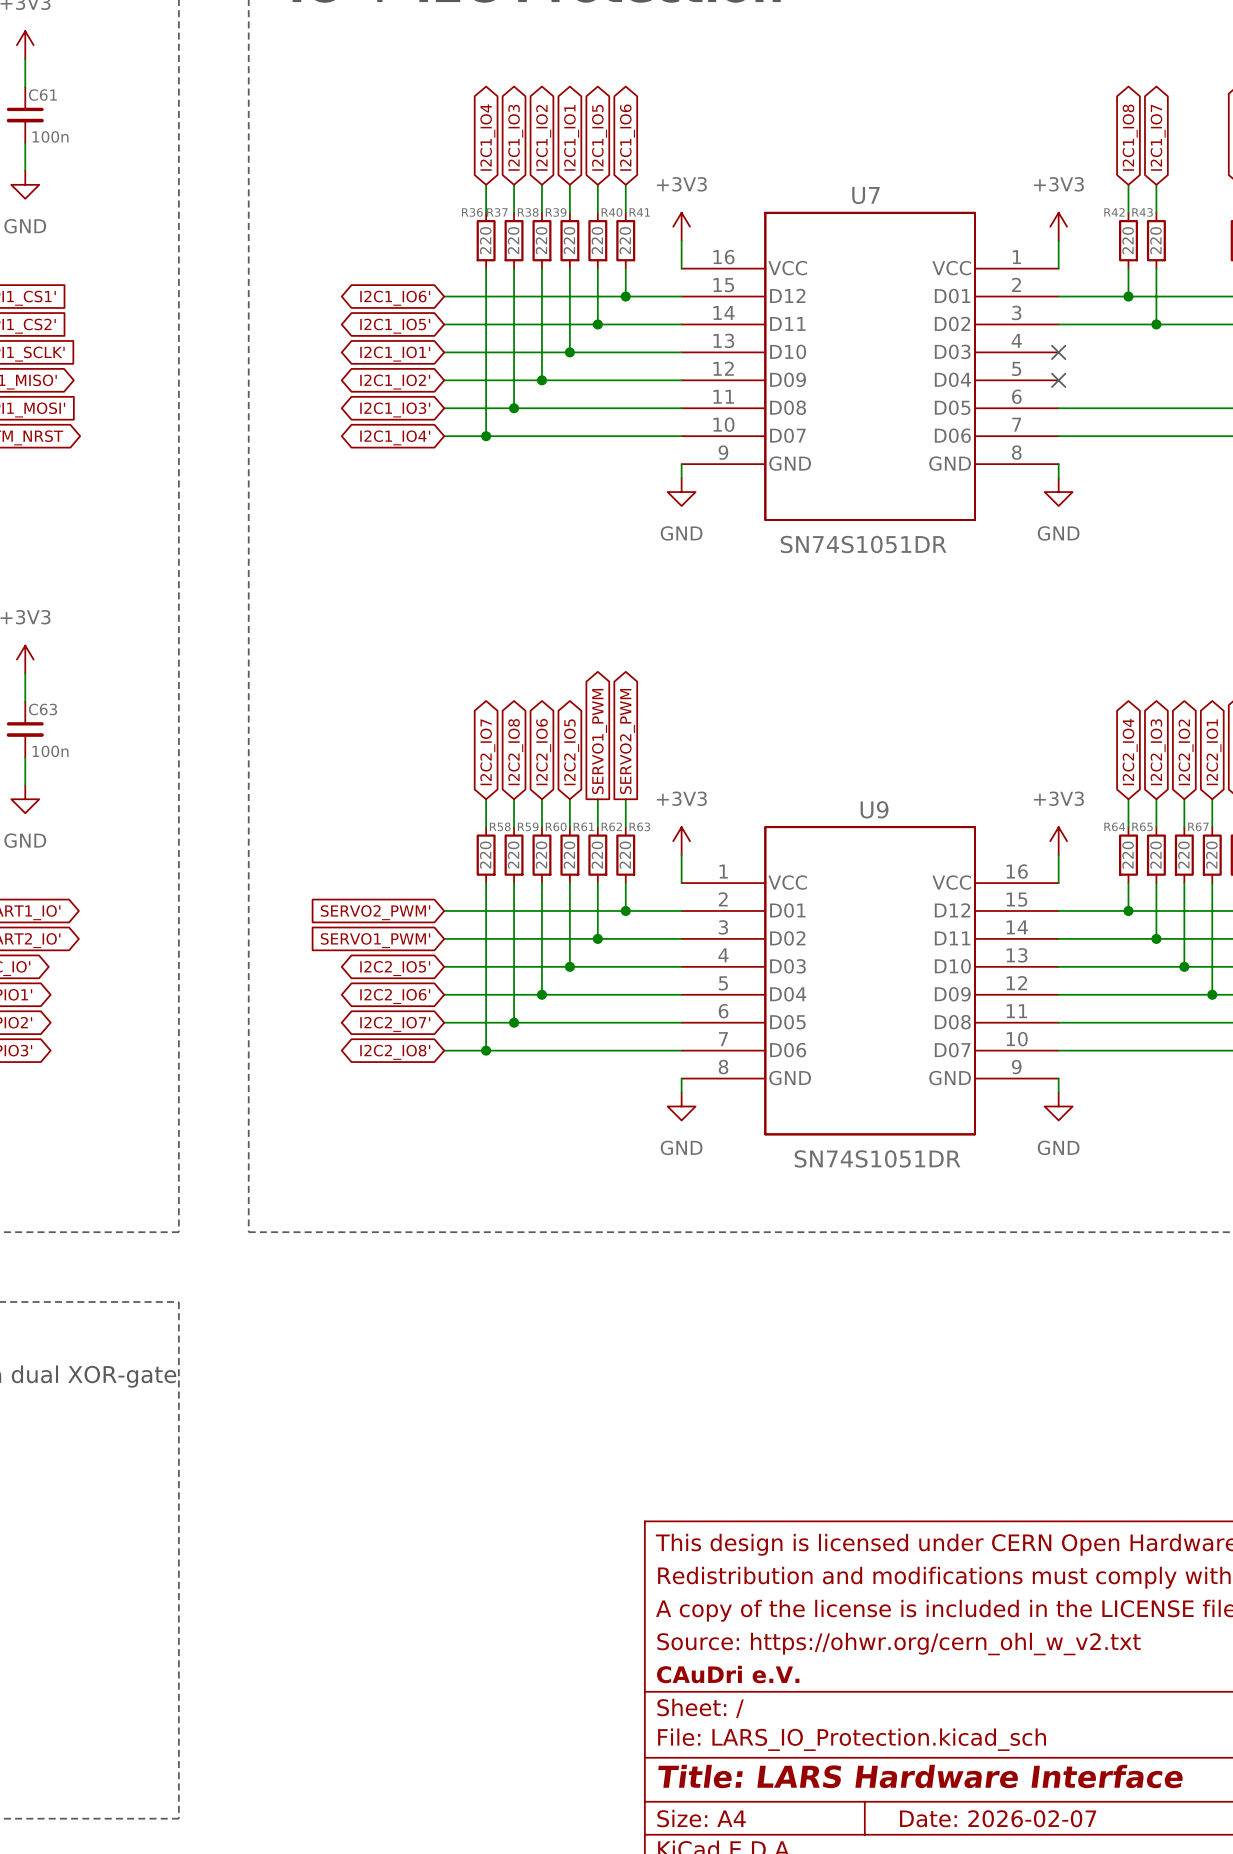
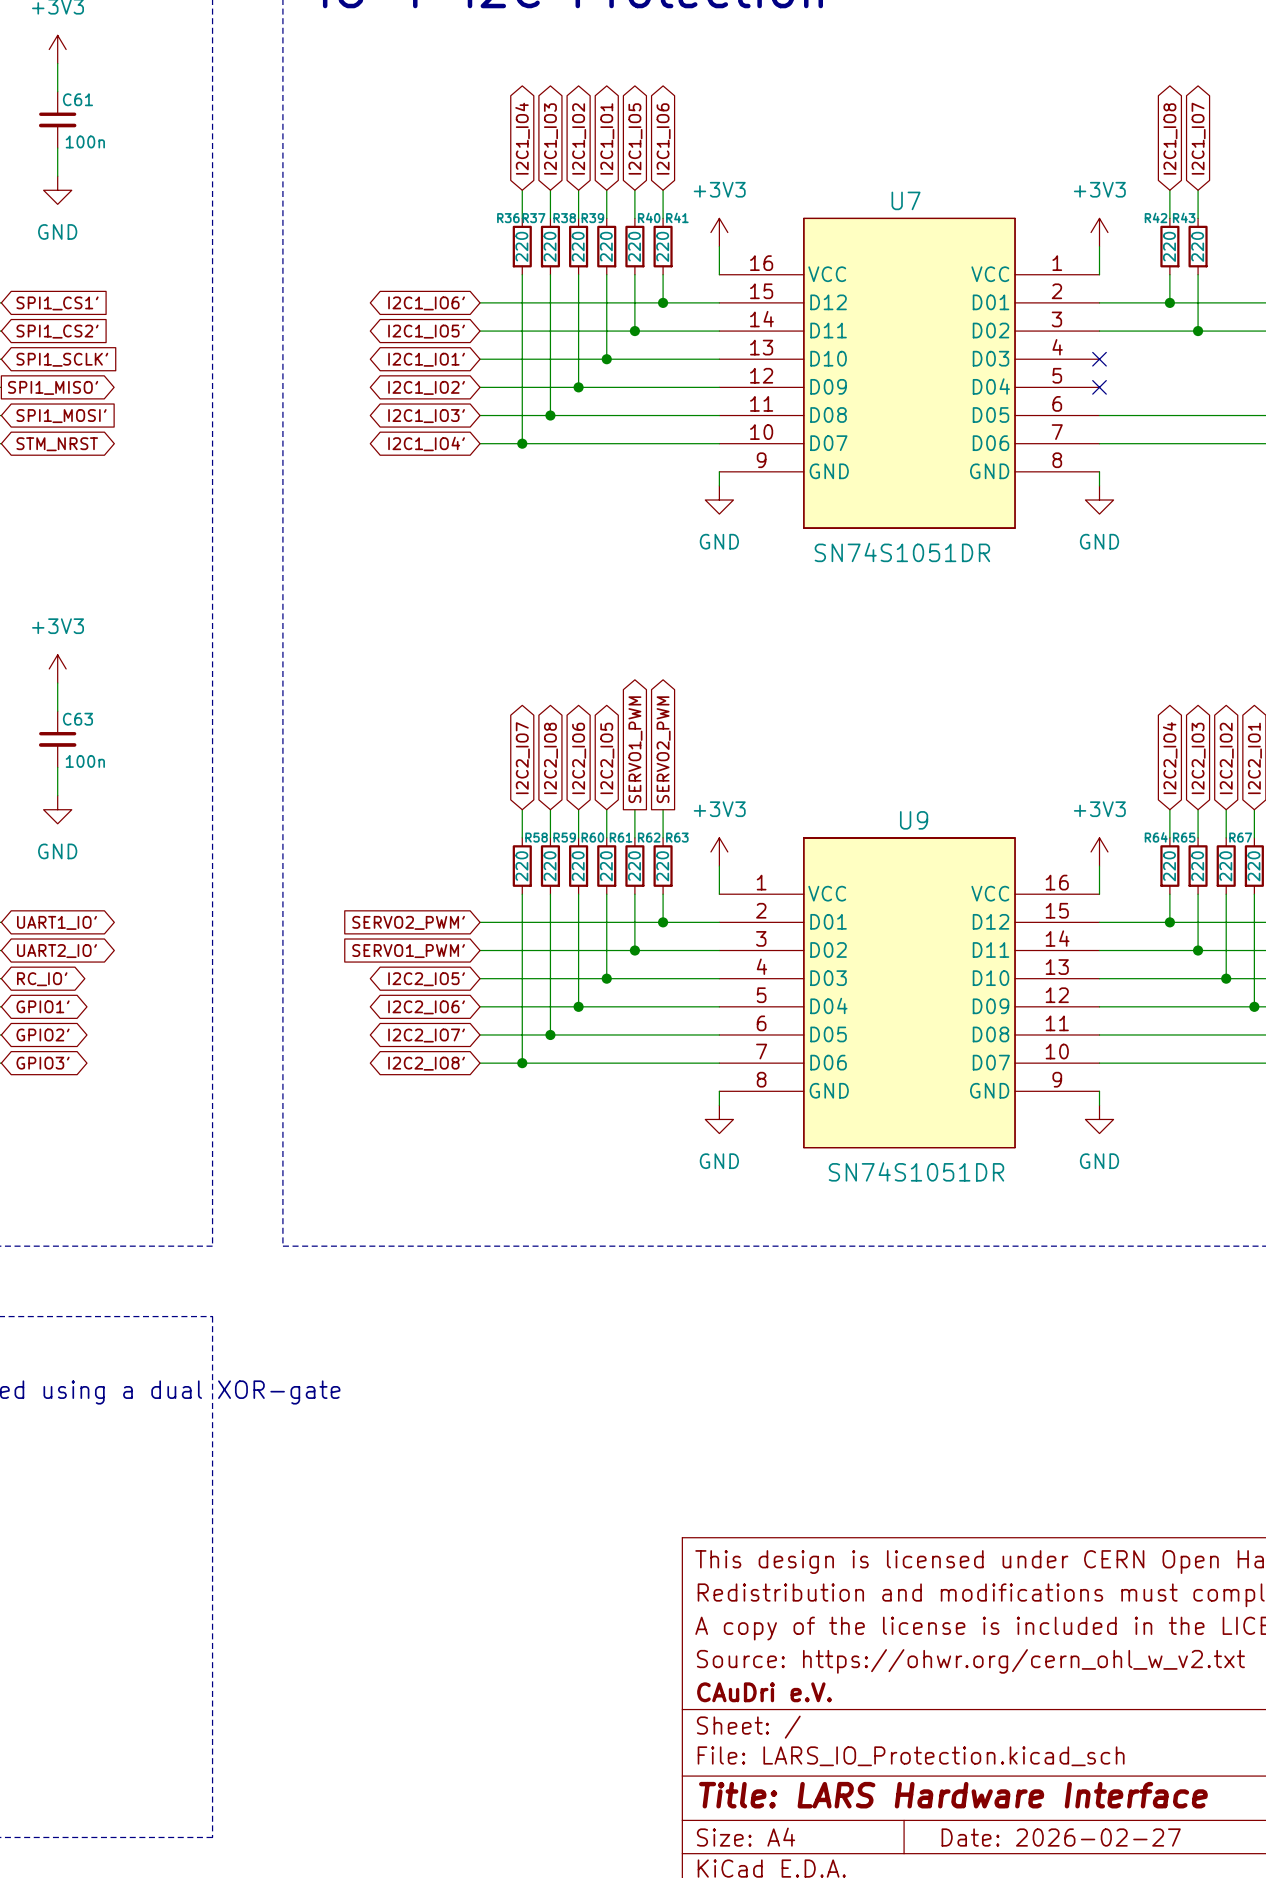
title block: Date: 2026-02-07 (998, 1818) -> Date: 2026-02-27 (1061, 1837)

